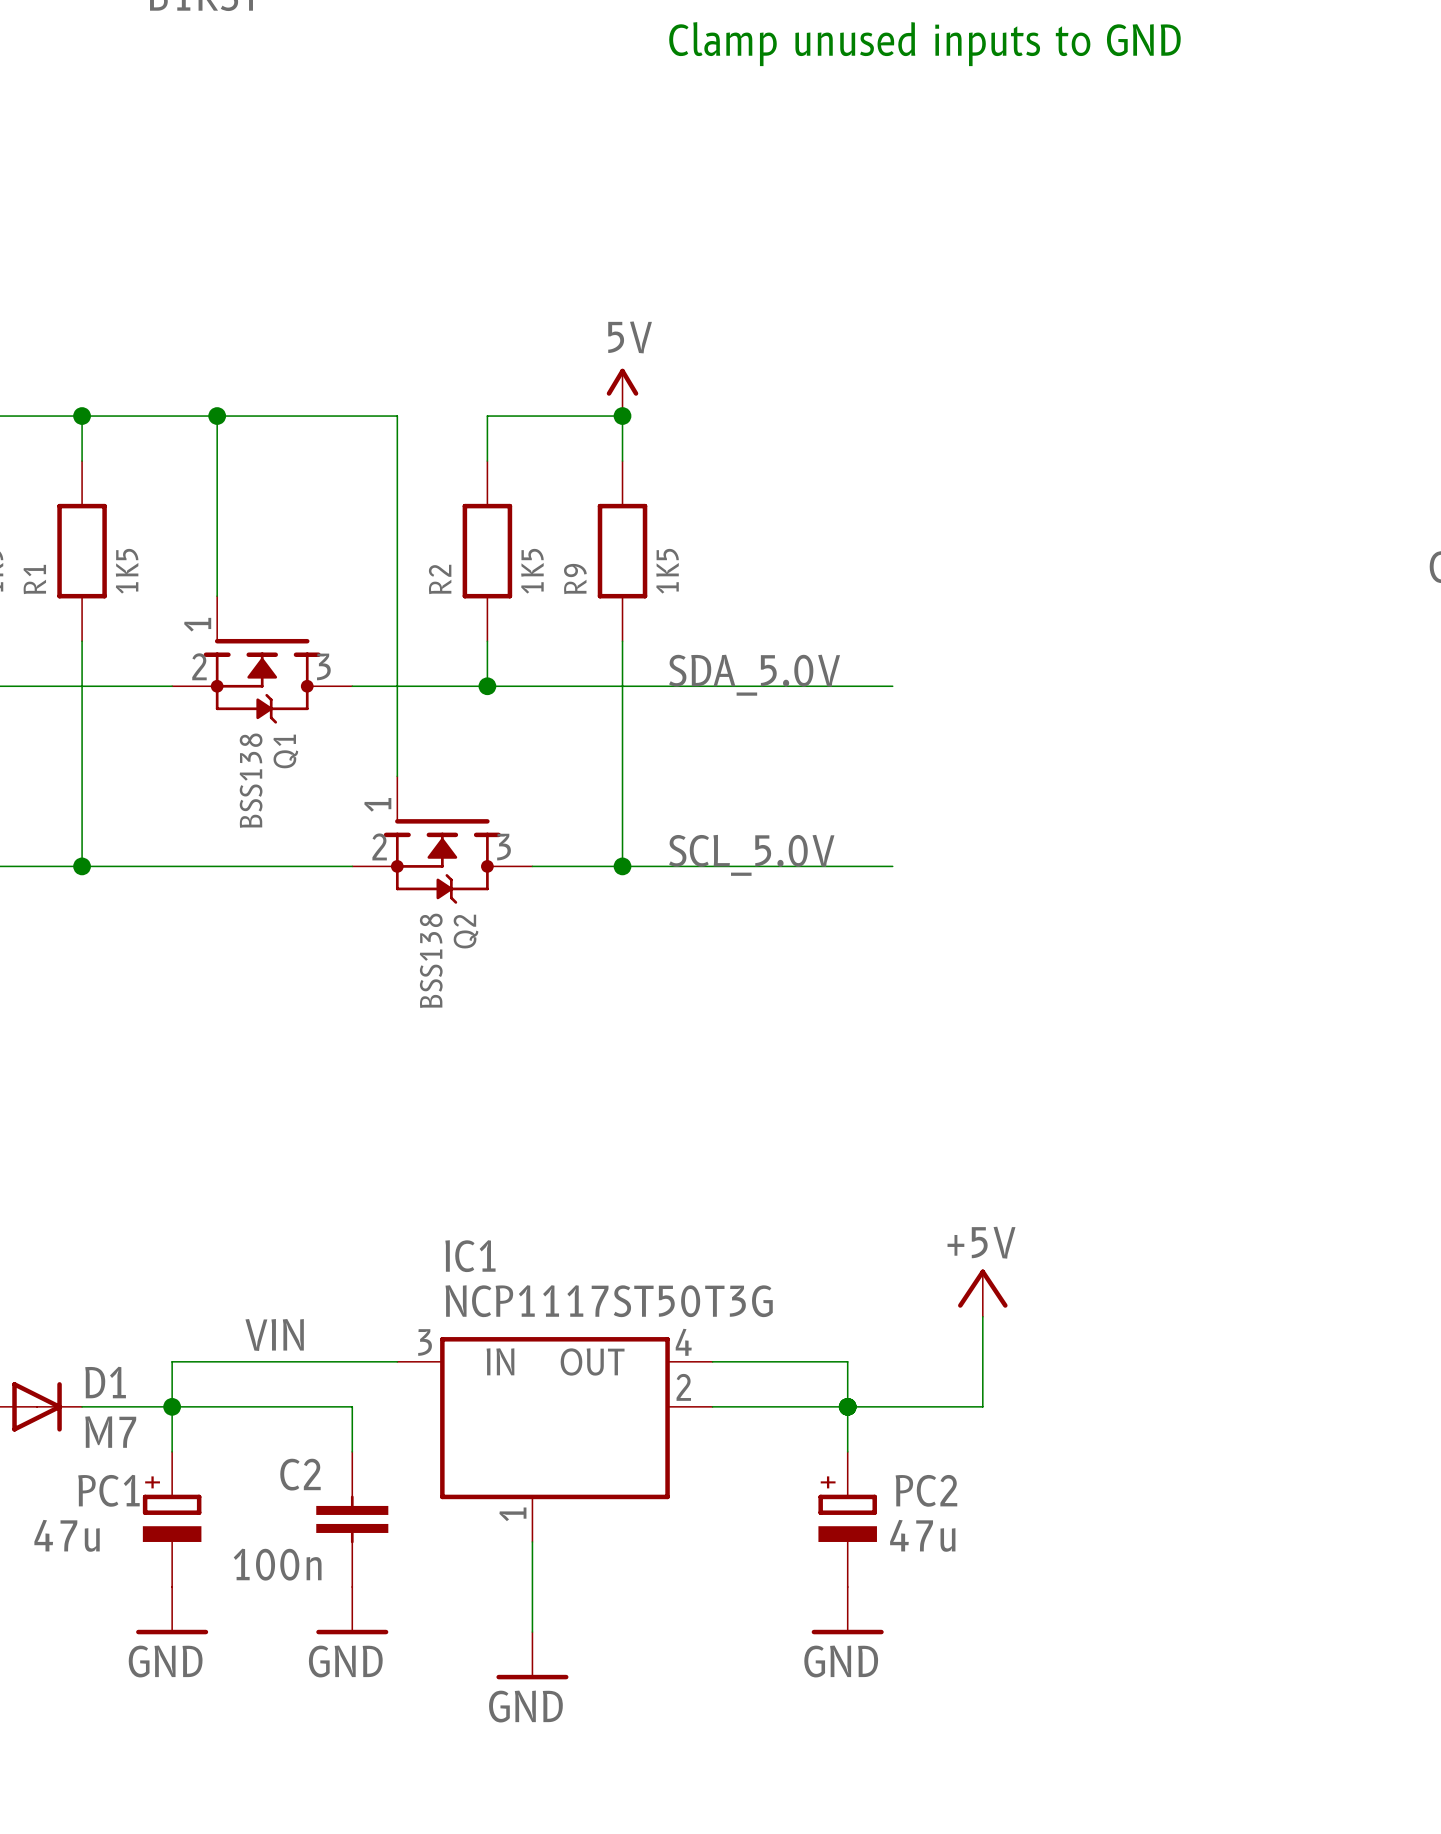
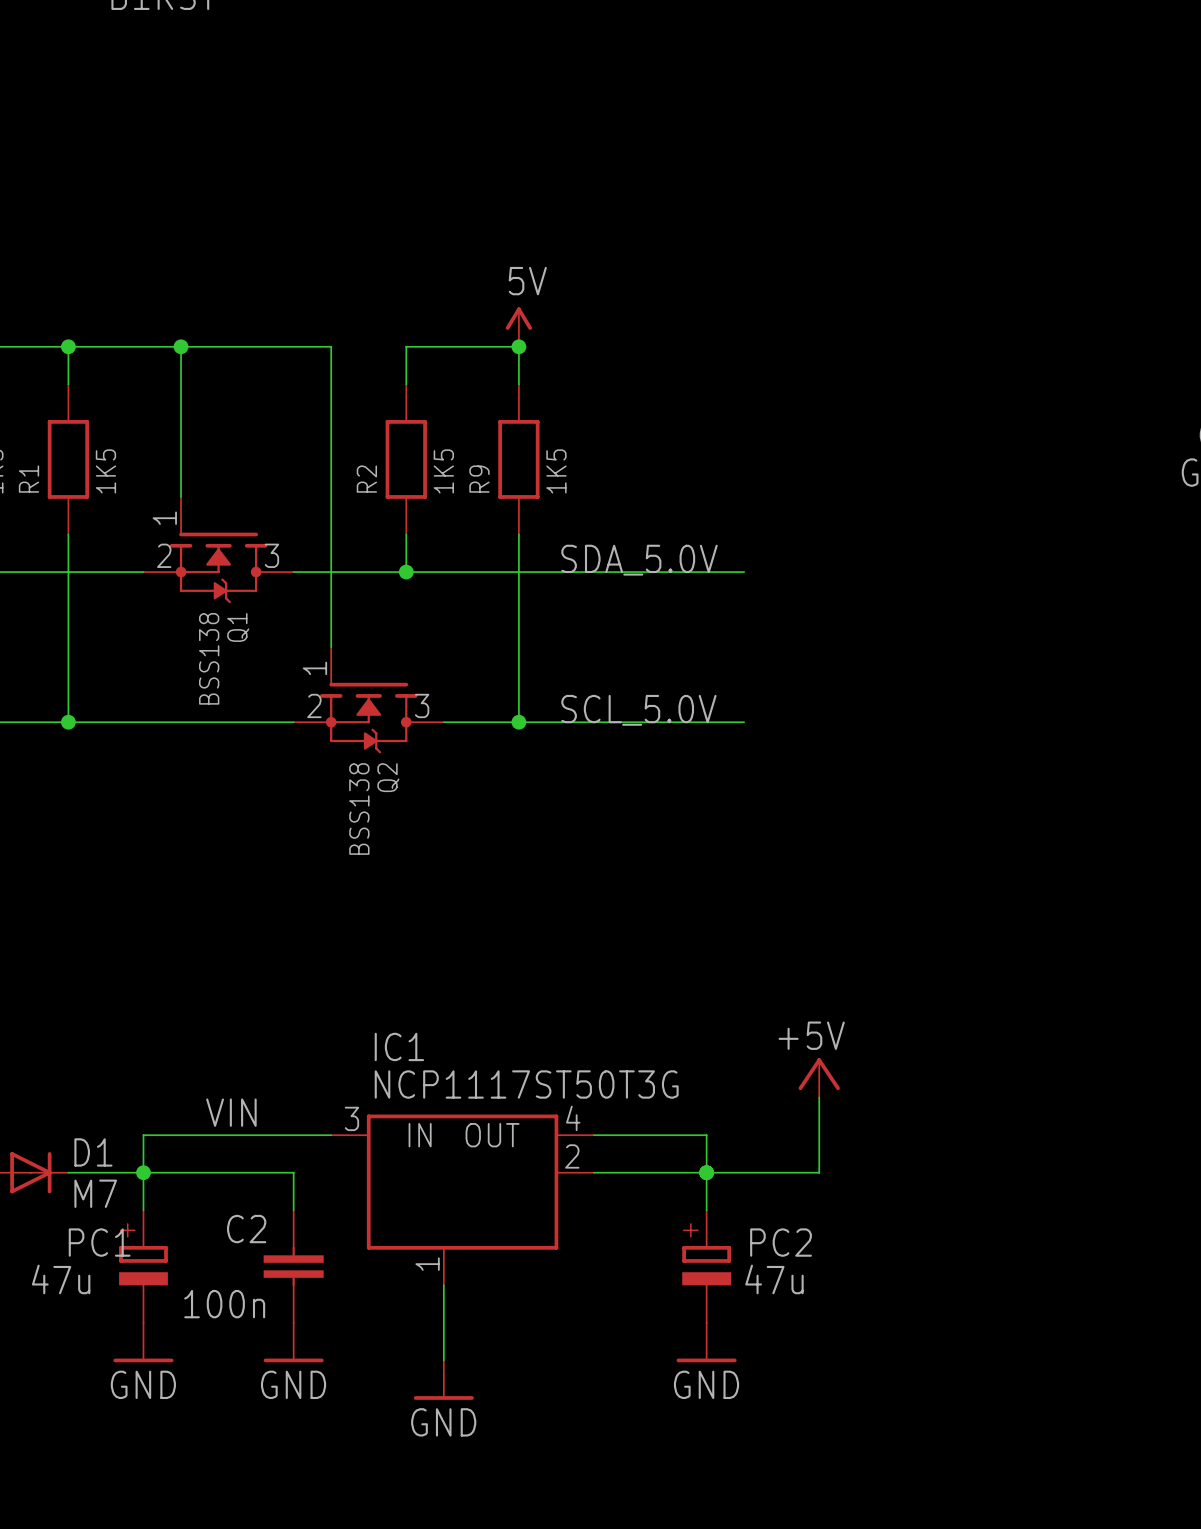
text: Clamp unused inputs to GND (924, 44) -> none

